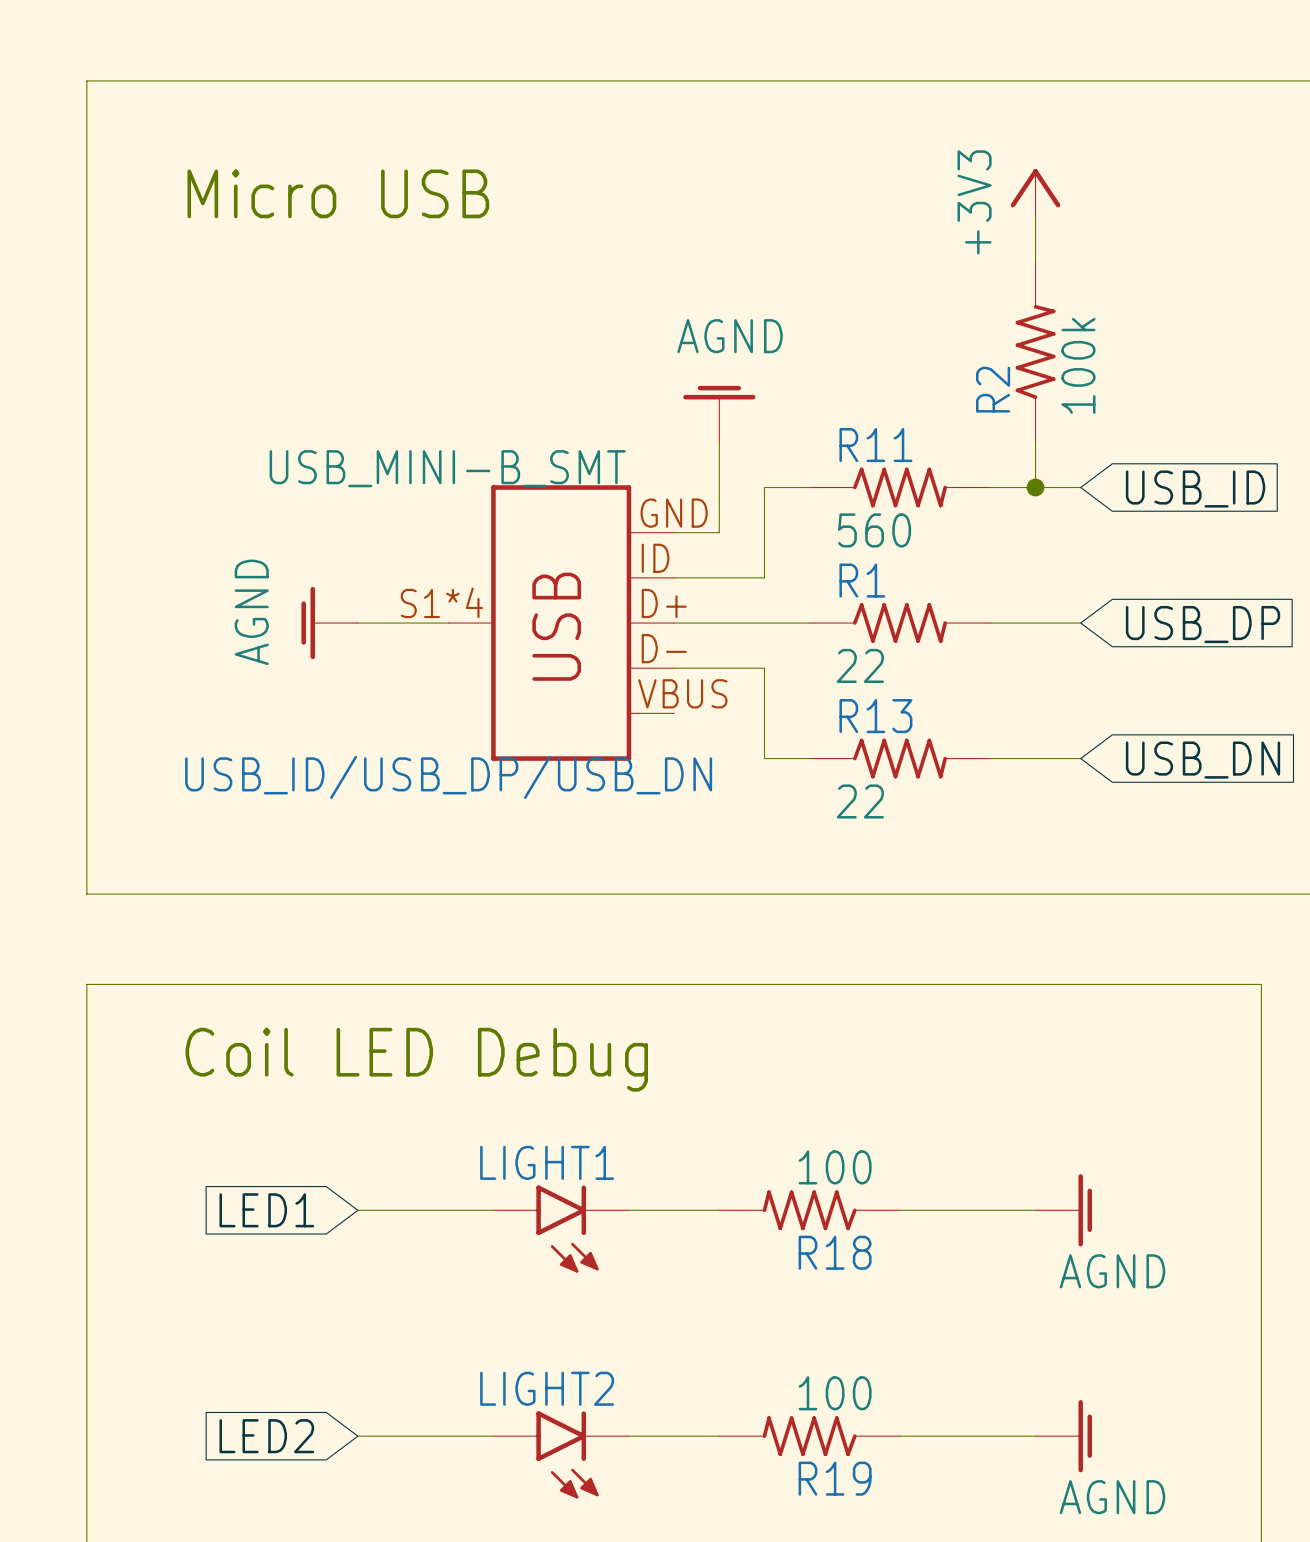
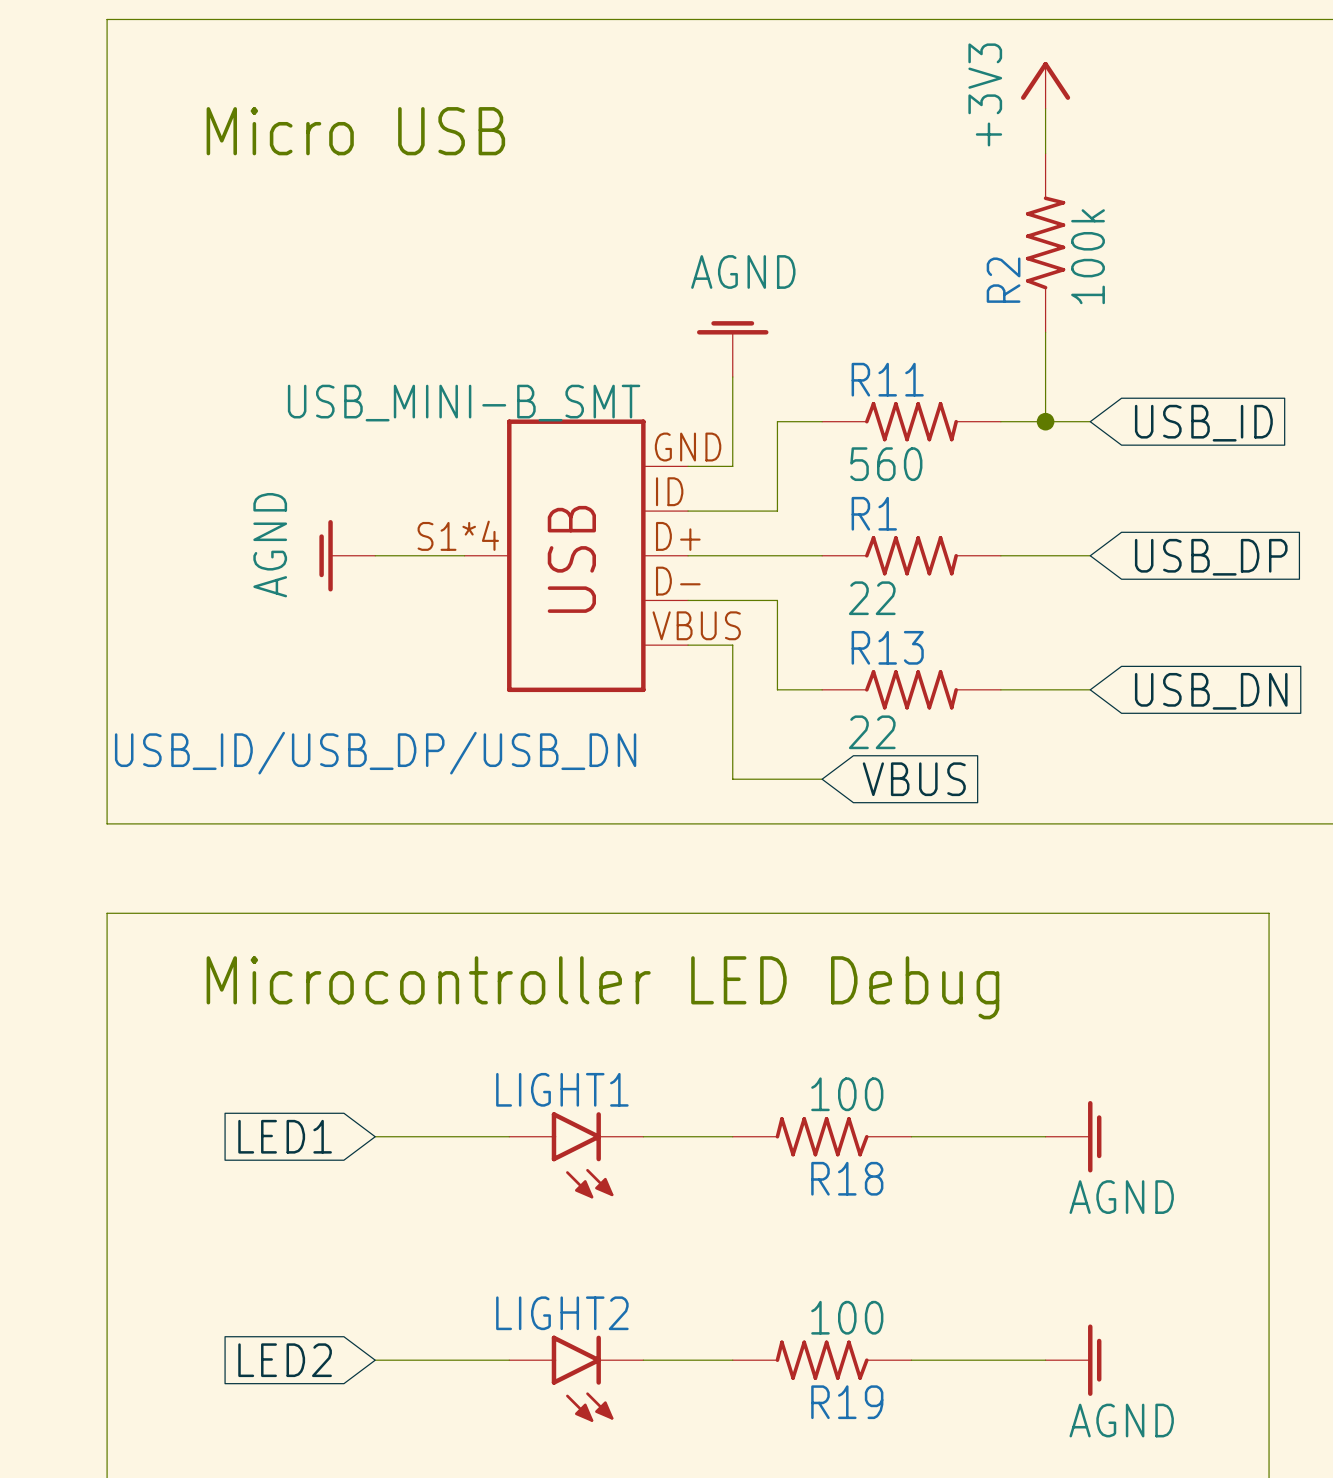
power symbol position: +3V3 (1035, 192) -> +3V3 (1045, 85)
R2 position: (1035, 351) -> (1045, 242)
wire: none -> (688, 645) (732, 645) (732, 779) (822, 779)
USB_ID/USB_DP/USB_DN name position: USB_ID/USB_DP/USB_DN (448, 777) -> USB_ID/USB_DP/USB_DN (375, 753)
global label: none -> VBUS (914, 779)
text: Coil LED Debug (416, 1059) -> Microcontroller LED Debug (602, 987)

